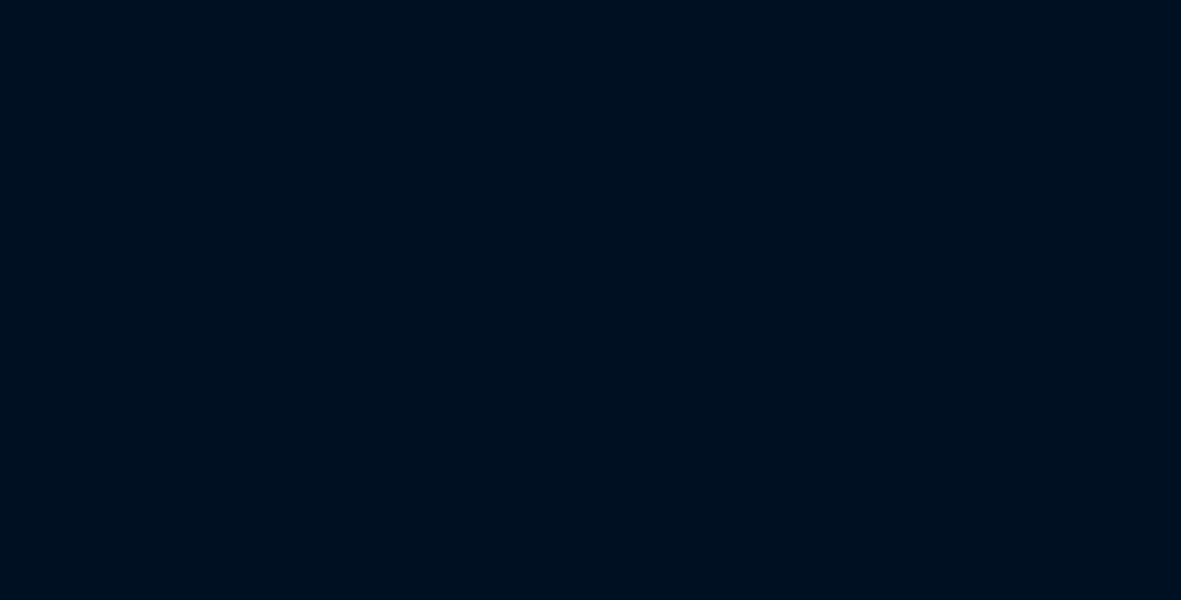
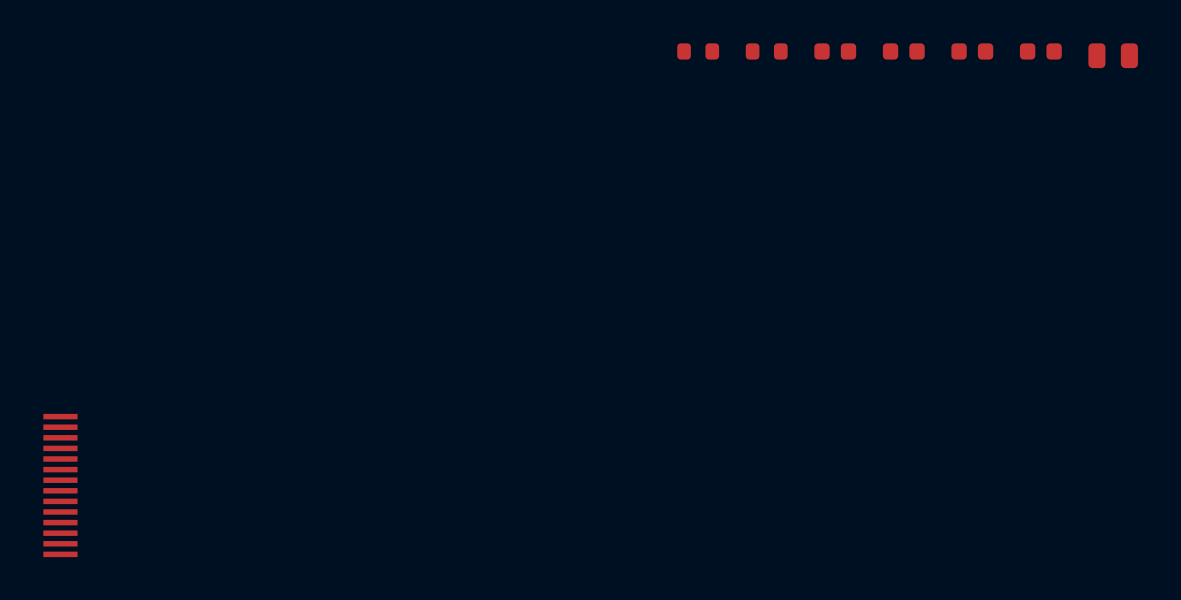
part: none -> (698, 51)
part: none -> (766, 51)
part: none -> (835, 51)
part: none -> (903, 51)
part: none -> (972, 51)
part: none -> (1040, 51)
part: none -> (1113, 55)
part: none -> (60, 485)

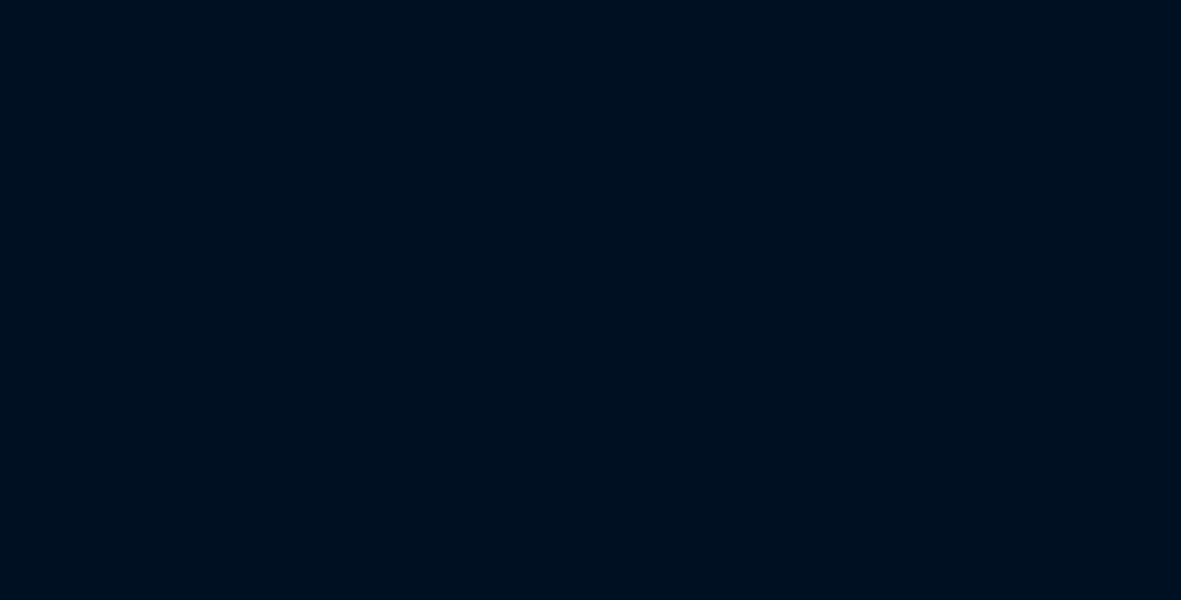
part: (698, 51) -> none
part: (766, 51) -> none
part: (835, 51) -> none
part: (903, 51) -> none
part: (972, 51) -> none
part: (1040, 51) -> none
part: (1113, 55) -> none
part: (60, 485) -> none

